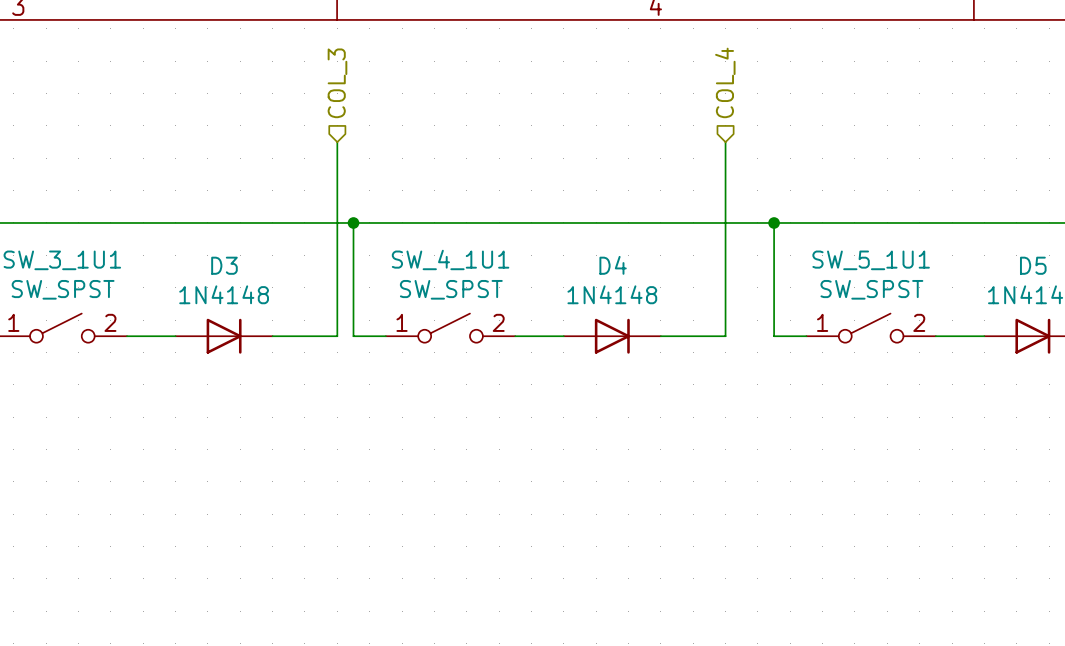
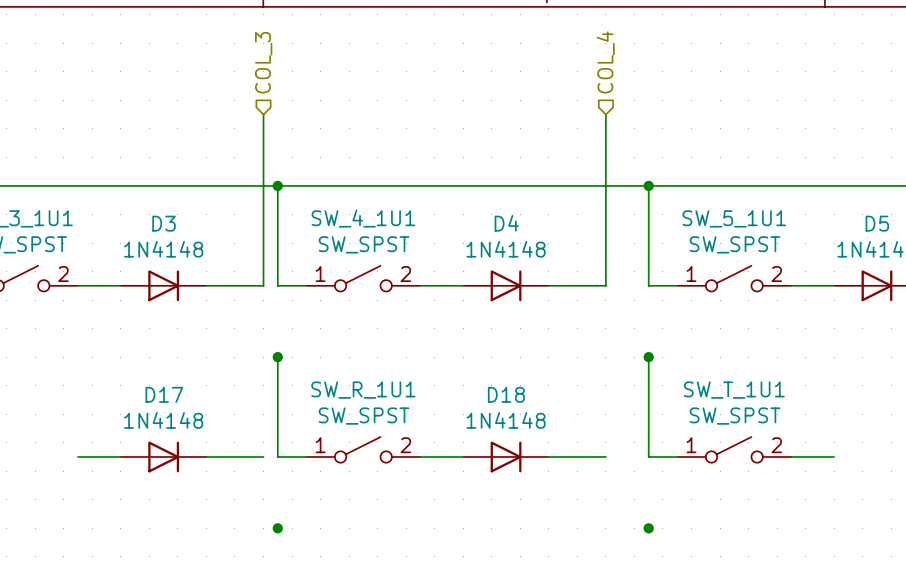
wire: none -> (277, 357) (277, 457) (306, 457)
junction: none -> (277, 357)
wire: none -> (648, 357) (648, 457) (677, 457)
junction: none -> (648, 357)
SW_R_1U1: none -> SW_SPST (363, 449)
SW_T_1U1: none -> SW_SPST (734, 449)
wire: none -> (78, 457) (120, 457)
D17: none -> 1N4148 (163, 457)
wire: none -> (206, 457) (263, 457)
wire: none -> (420, 457) (463, 457)
D18: none -> 1N4148 (506, 457)
wire: none -> (548, 457) (605, 457)
wire: none -> (791, 457) (834, 457)
junction: none -> (277, 528)
junction: none -> (648, 528)

